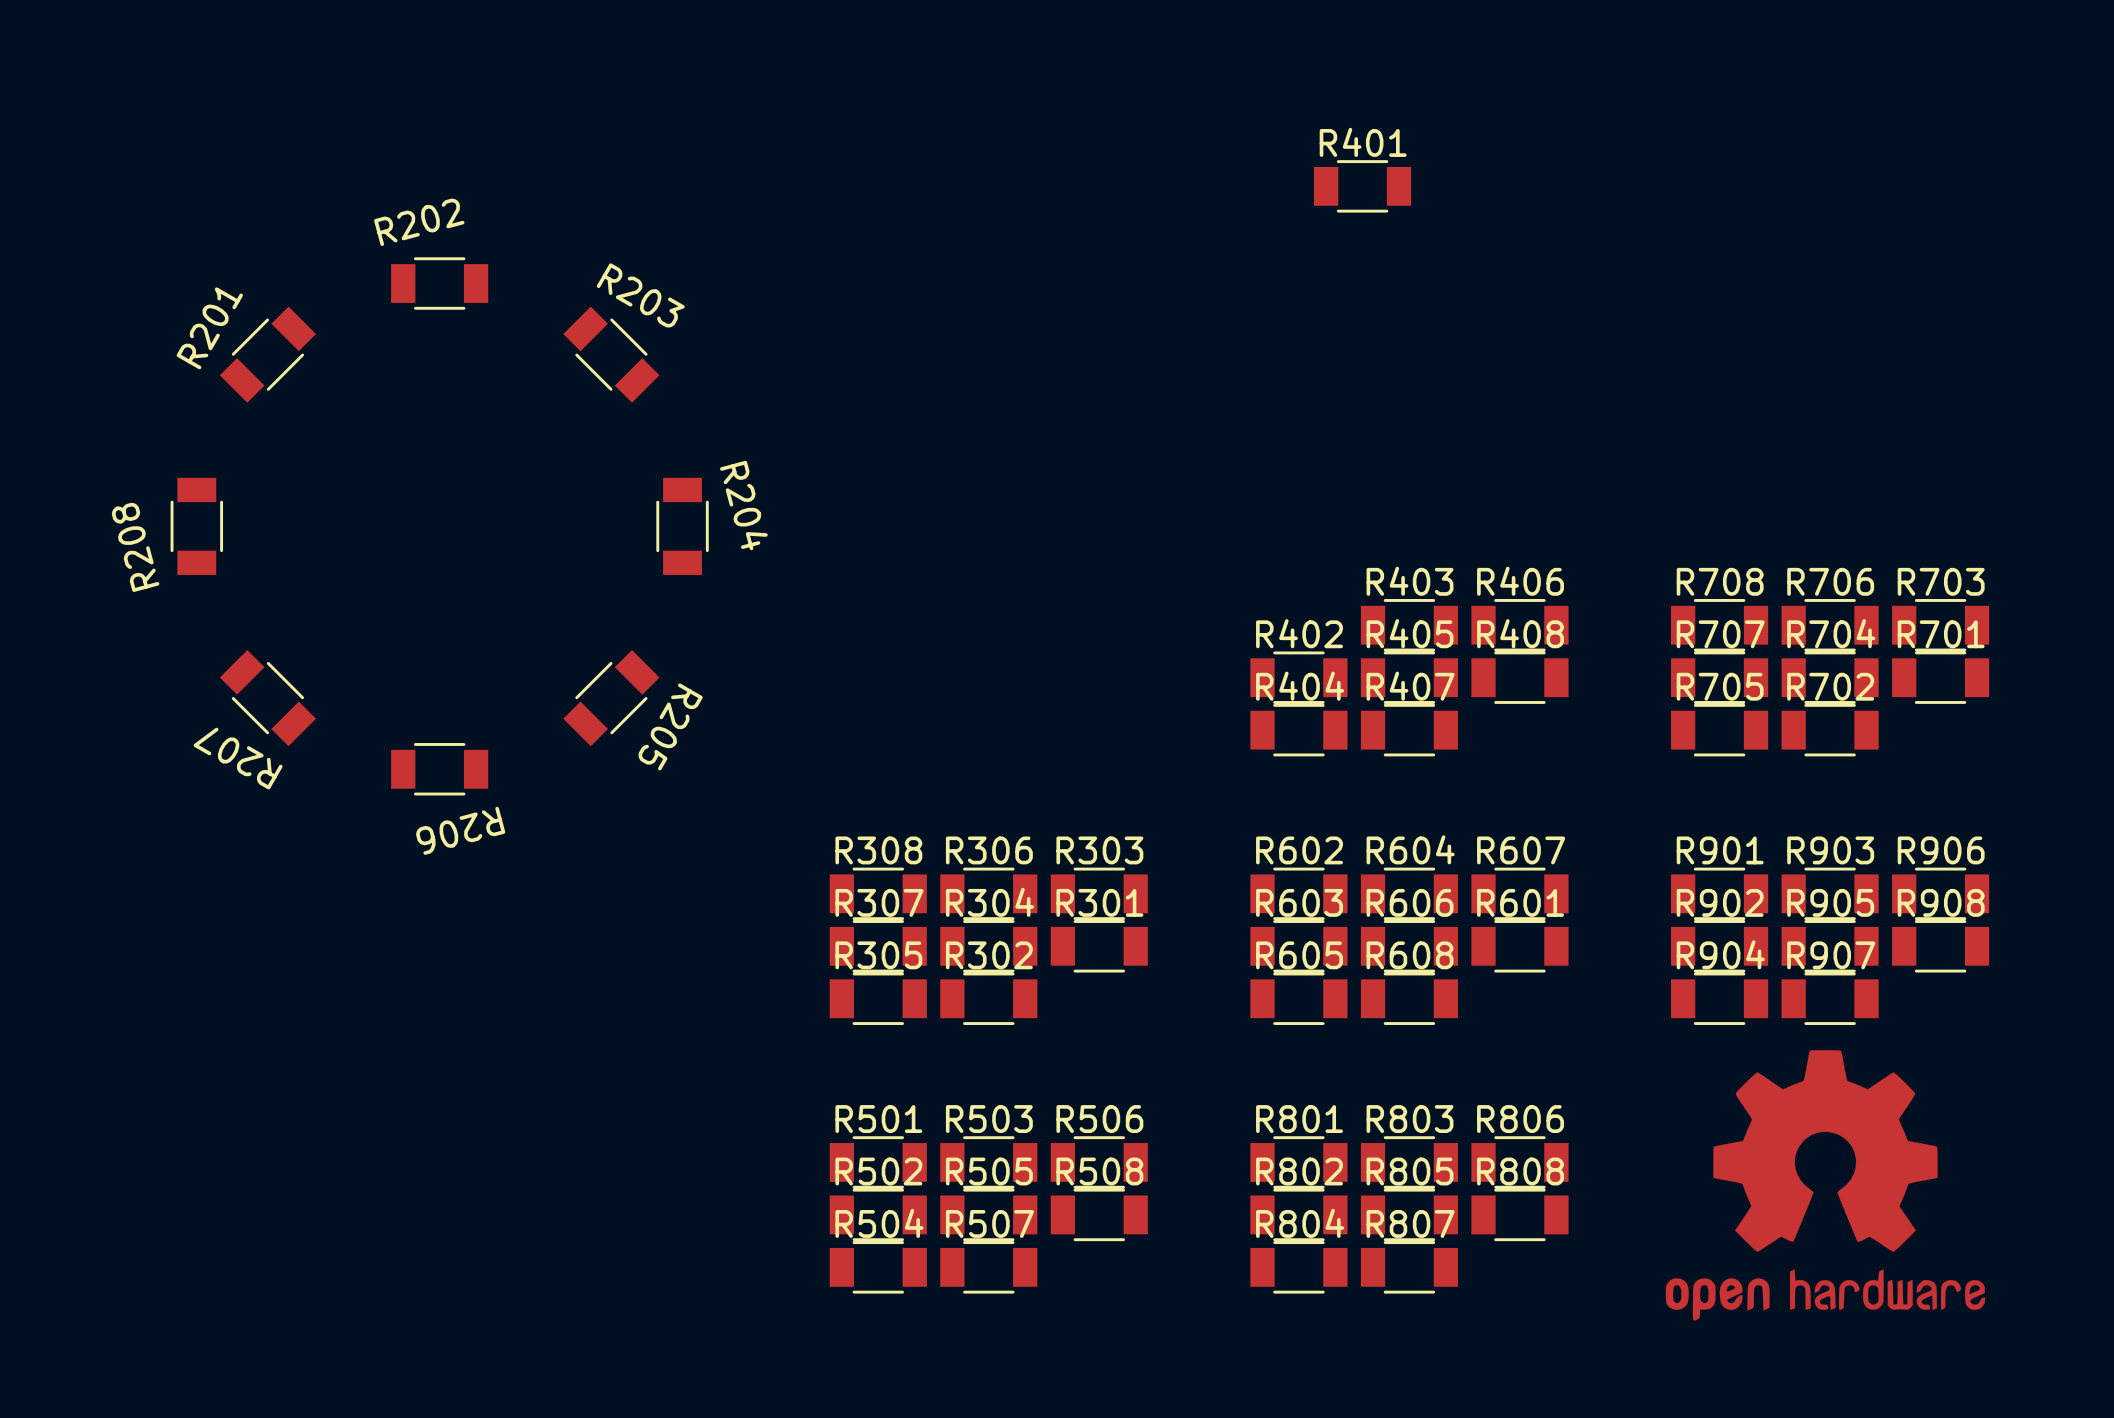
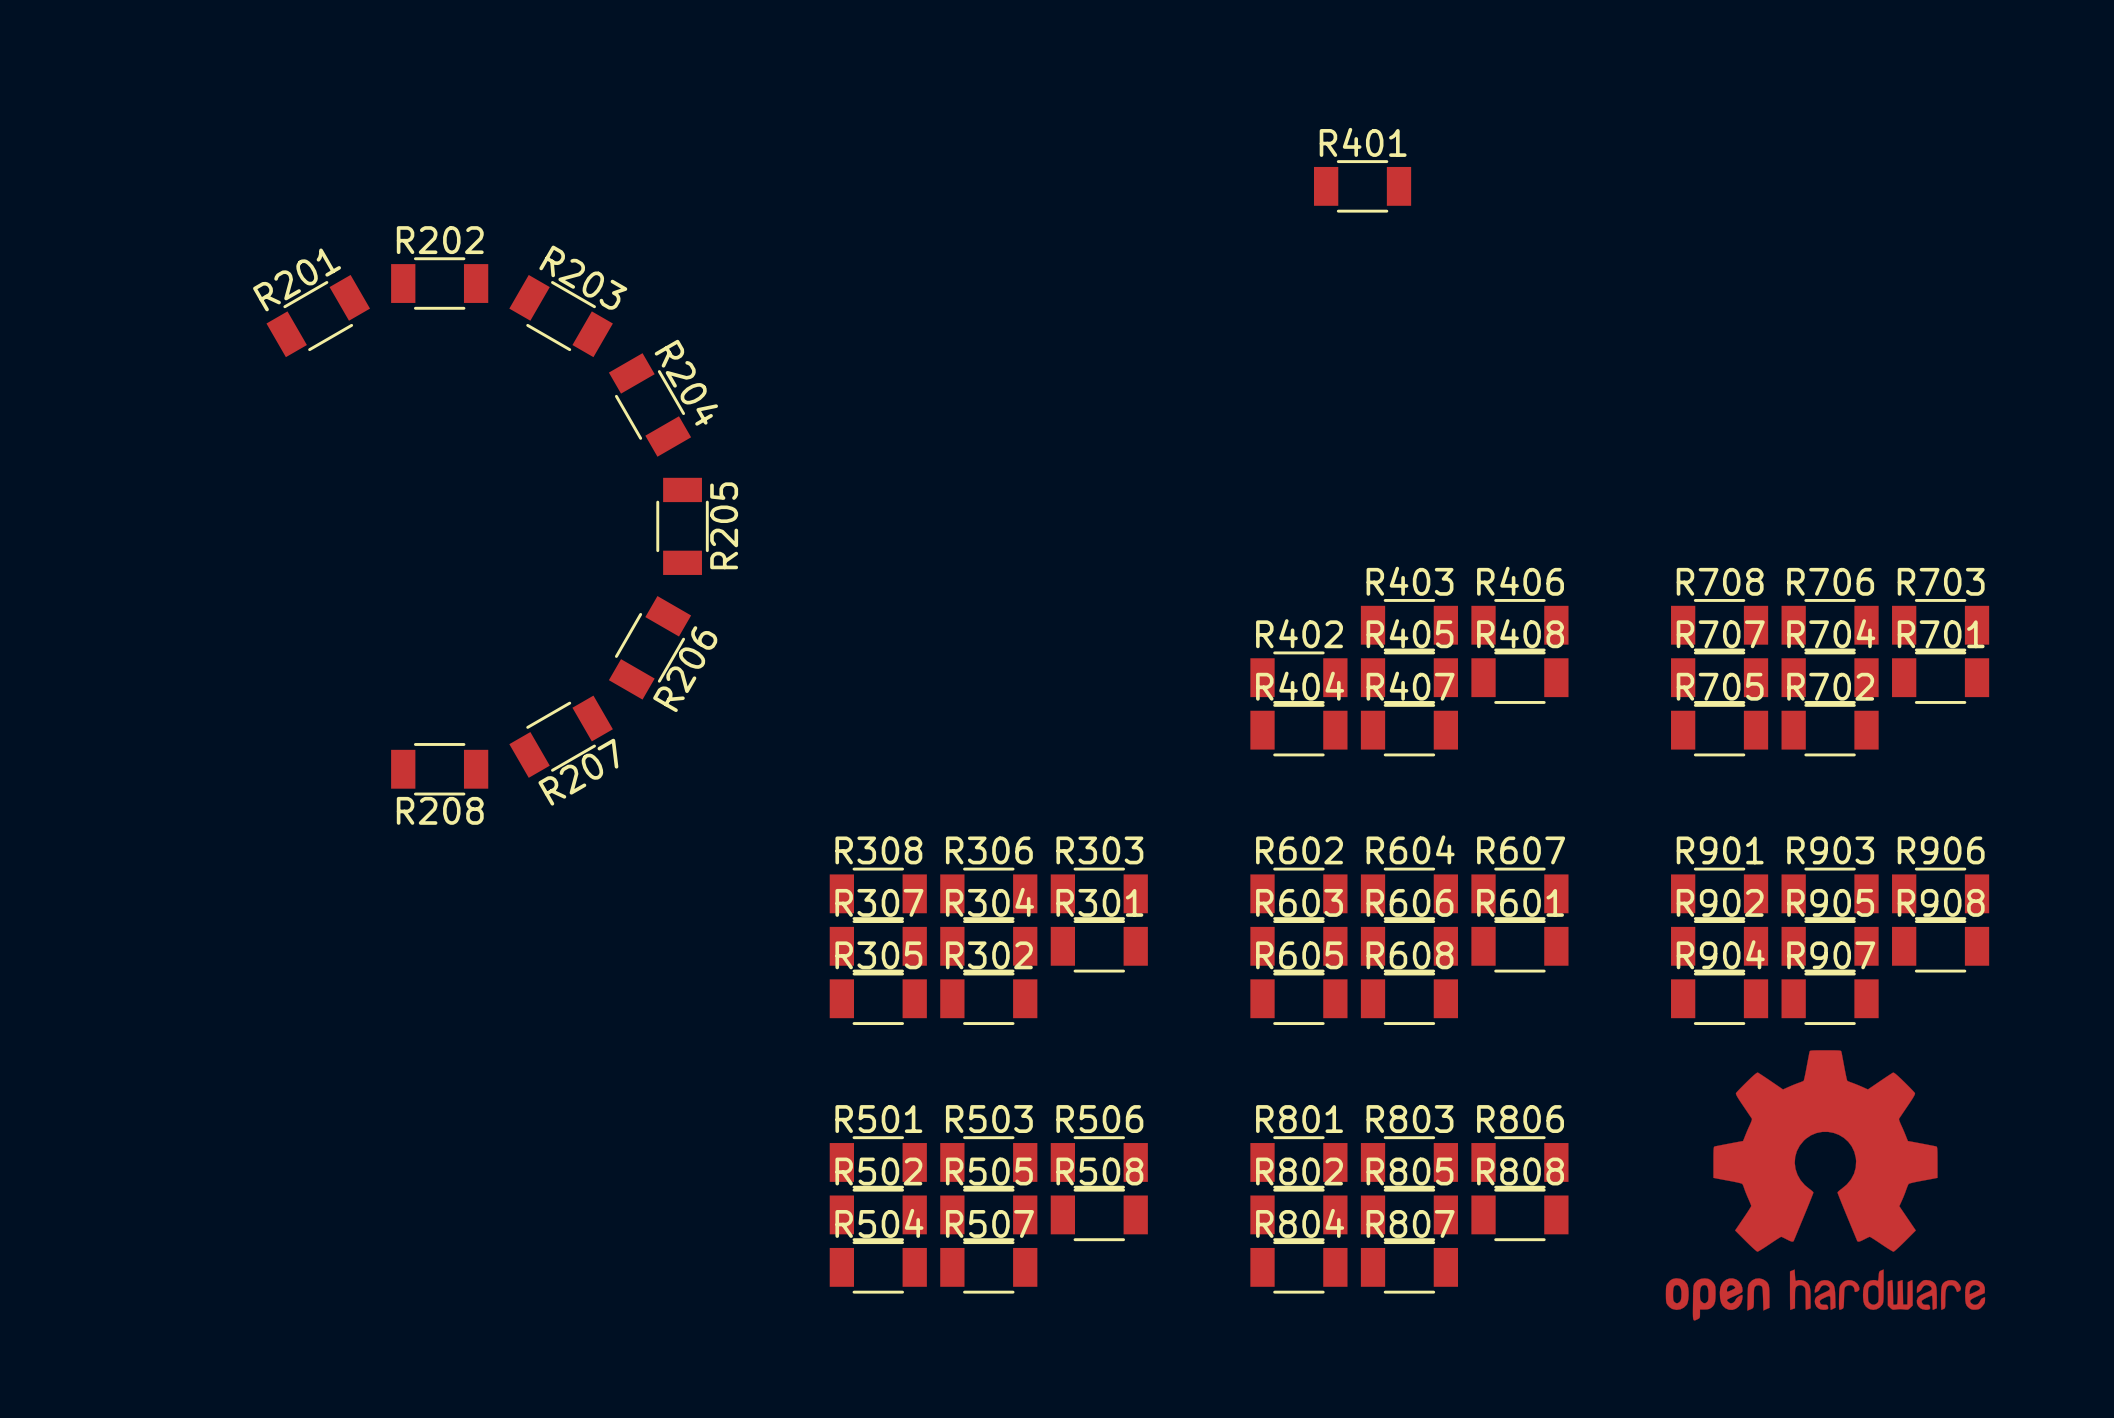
R202 name rotation: 0° (419, 222) -> 15° clockwise (440, 240)
R201 rotation: 0° (267, 354) -> 15° clockwise (318, 316)
R201 position: (267, 354) -> (318, 316)
R203 rotation: 0° (611, 354) -> 15° counterclockwise (561, 316)
R203 position: (611, 354) -> (561, 316)
R204: none -> (650, 404)
R204 name: R204 (743, 505) -> R205 (724, 525)
R208: (196, 526) -> none
R206: none -> (650, 647)
R207 rotation: 0° (267, 698) -> 75° counterclockwise (561, 736)
R207 position: (267, 698) -> (561, 736)
R205: (611, 698) -> none
R206 name: R206 (460, 830) -> R208 (440, 810)

